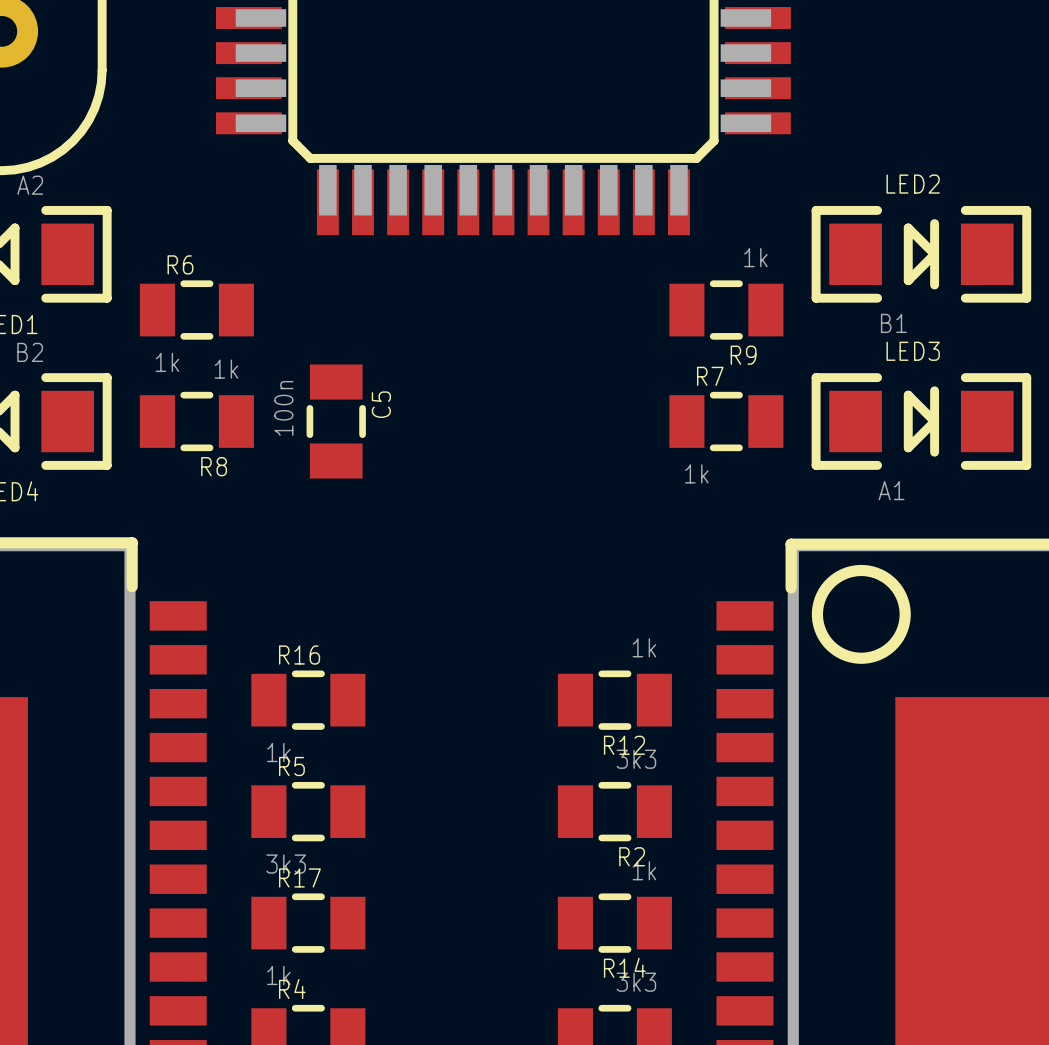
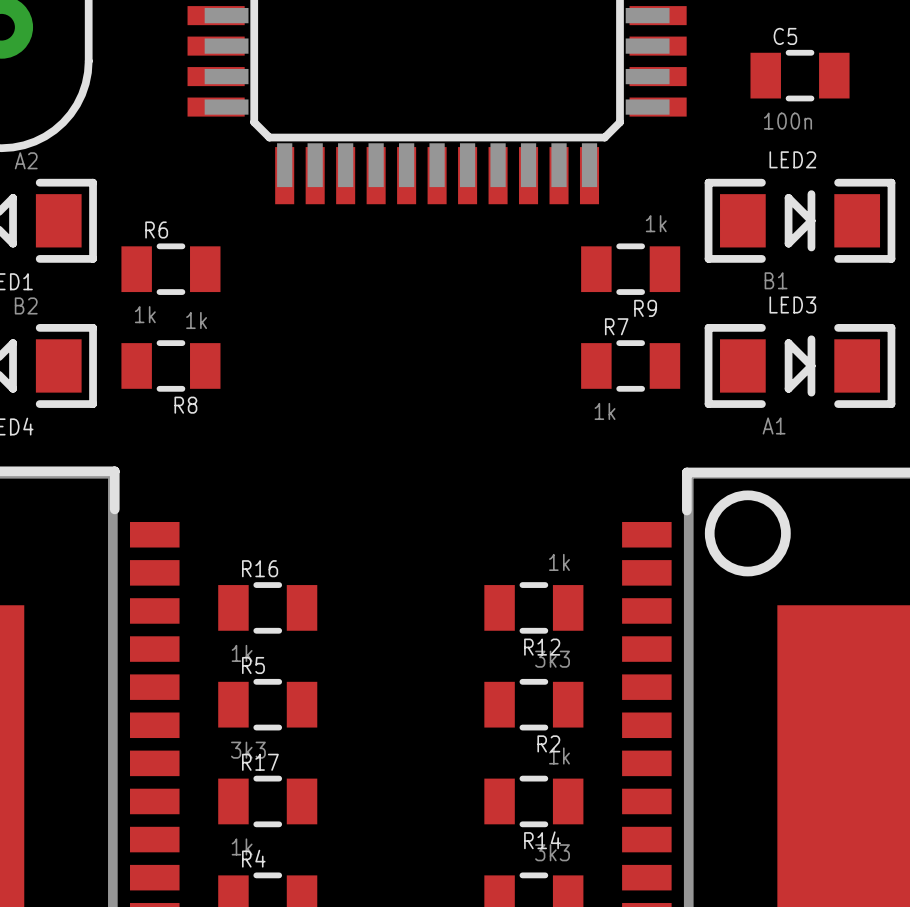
C5 rotation: 0° (336, 421) -> 90° clockwise (800, 75)
C5 position: (336, 421) -> (800, 75)

